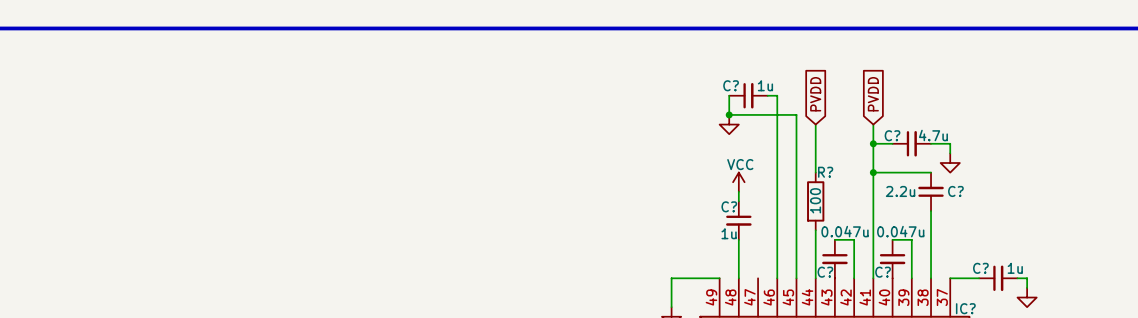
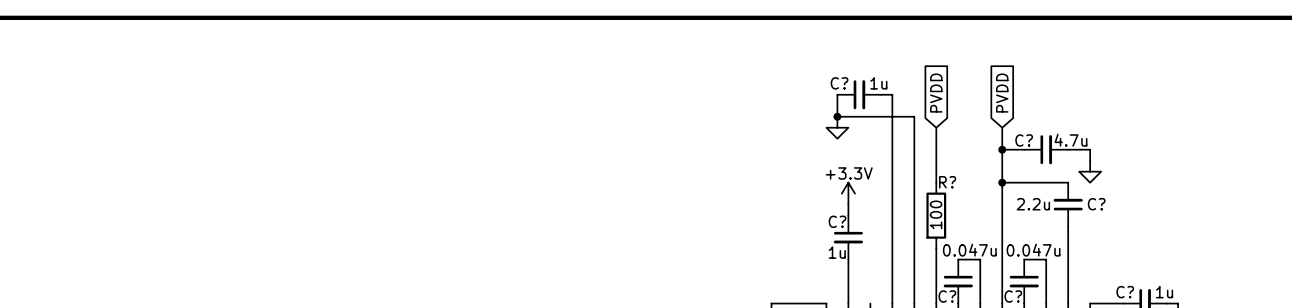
power symbol: VCC (738, 182) -> +3.3V (848, 193)

